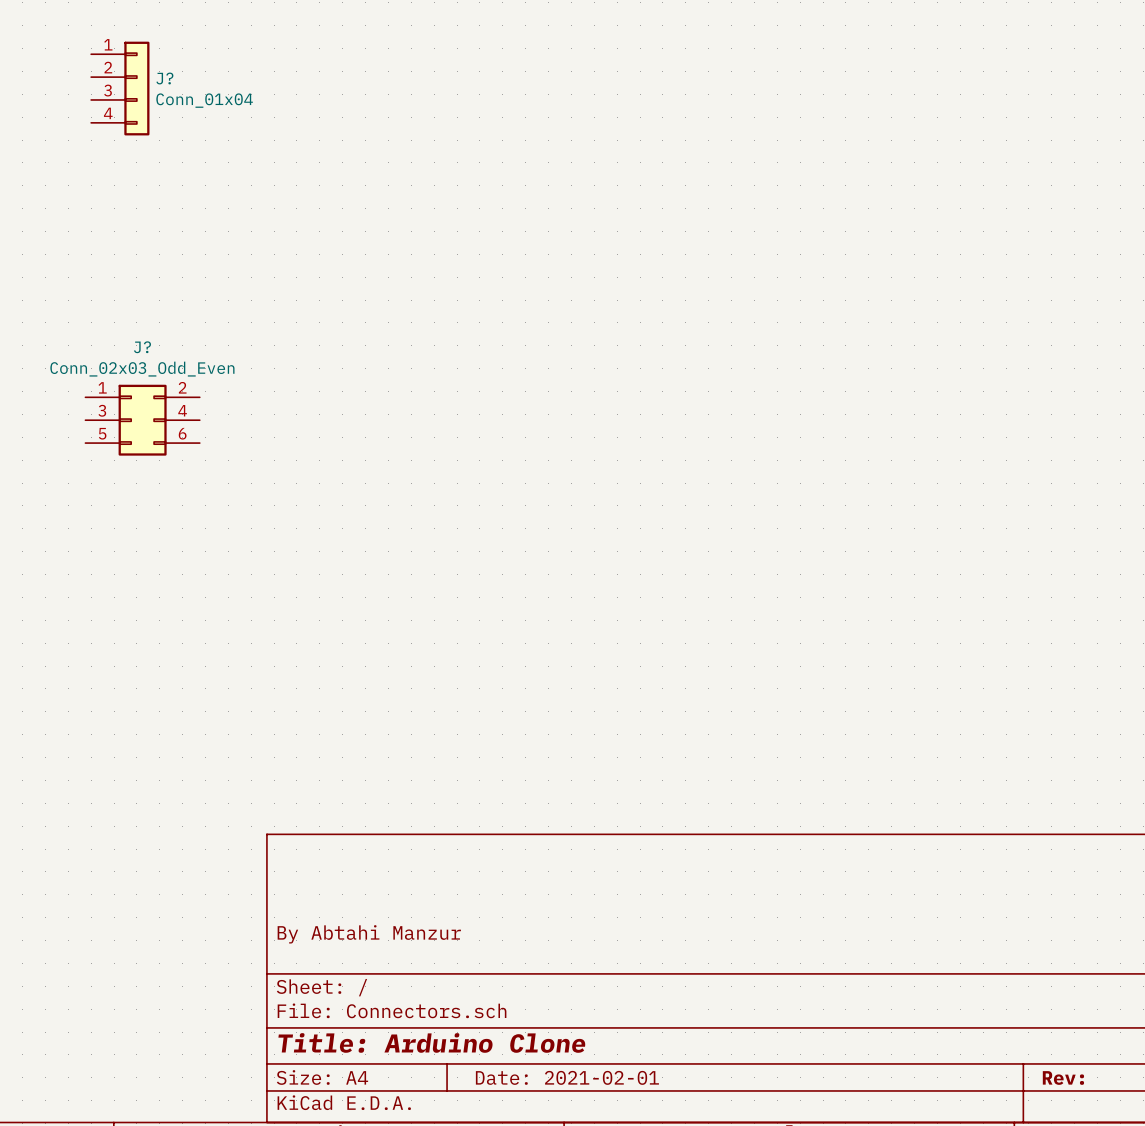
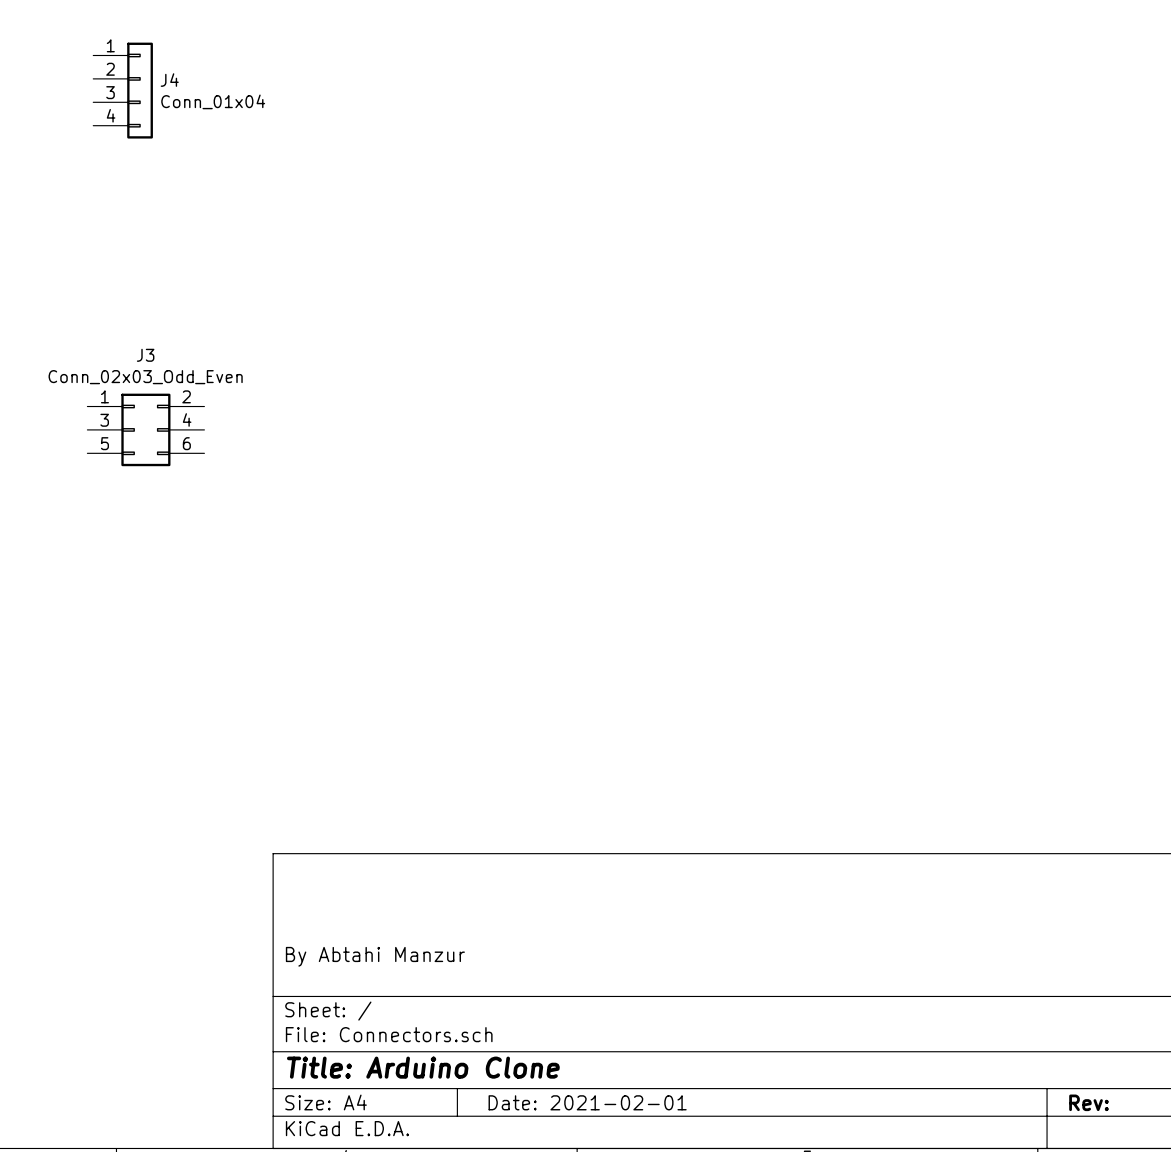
J? name: J? (164, 78) -> J4 (169, 80)
J? name: J? (142, 347) -> J3 (145, 355)

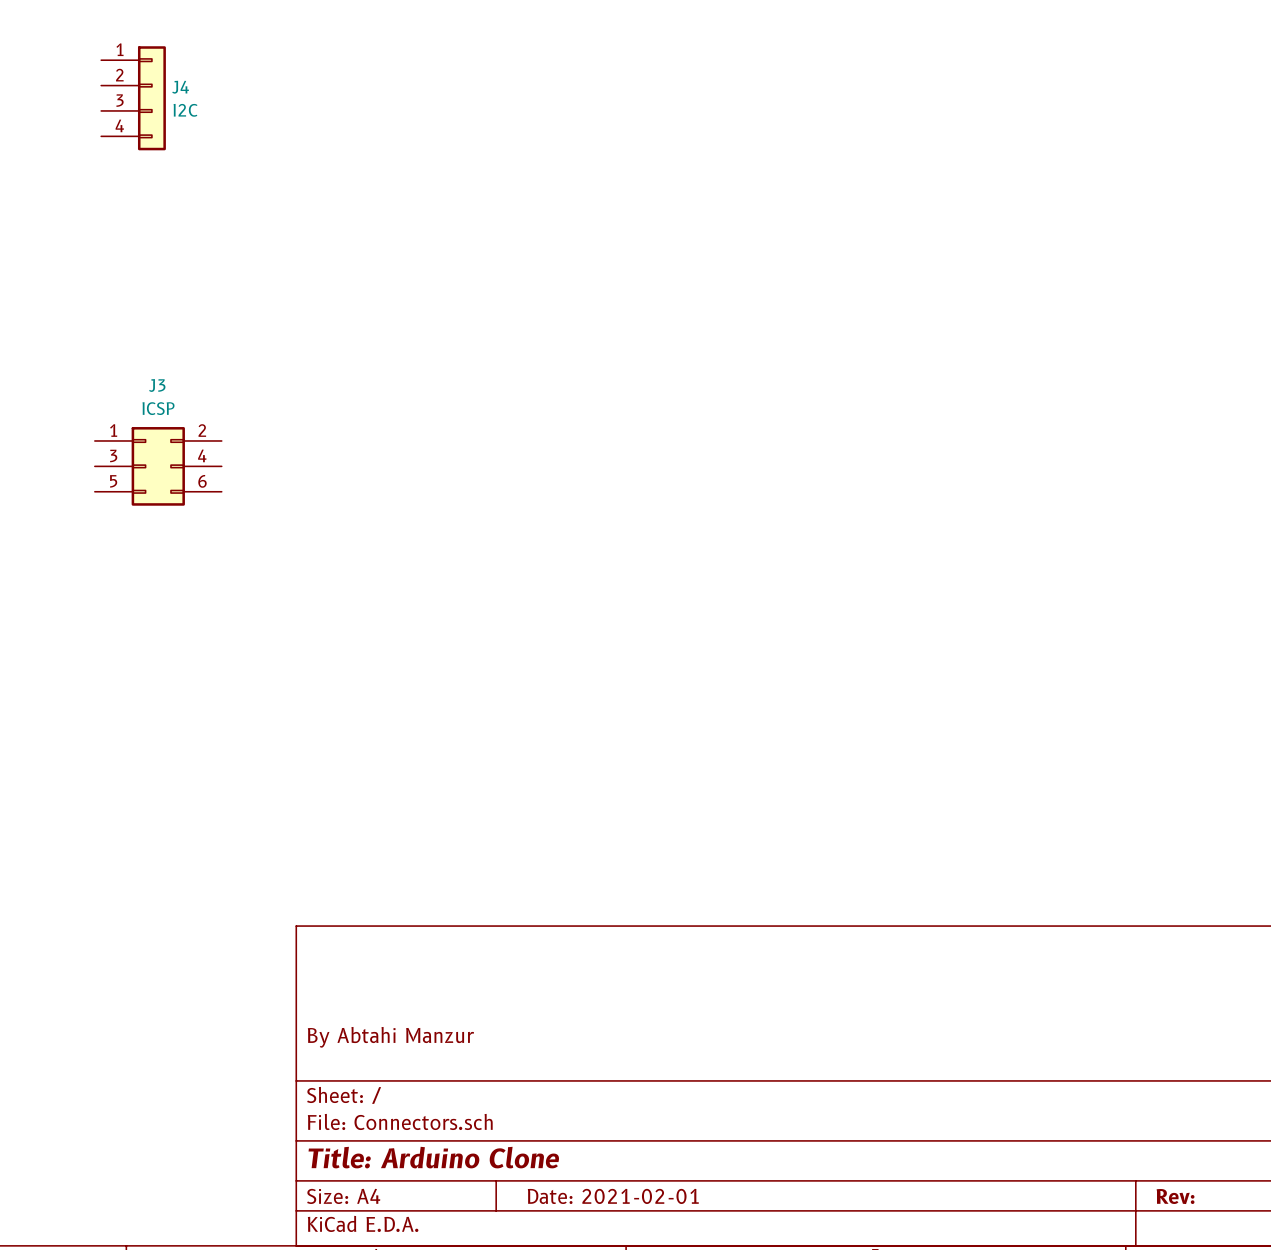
J4 value: Conn_01x04 (213, 101) -> I2C (185, 110)
J3 value: Conn_02x03_Odd_Even (145, 377) -> ICSP (158, 408)

